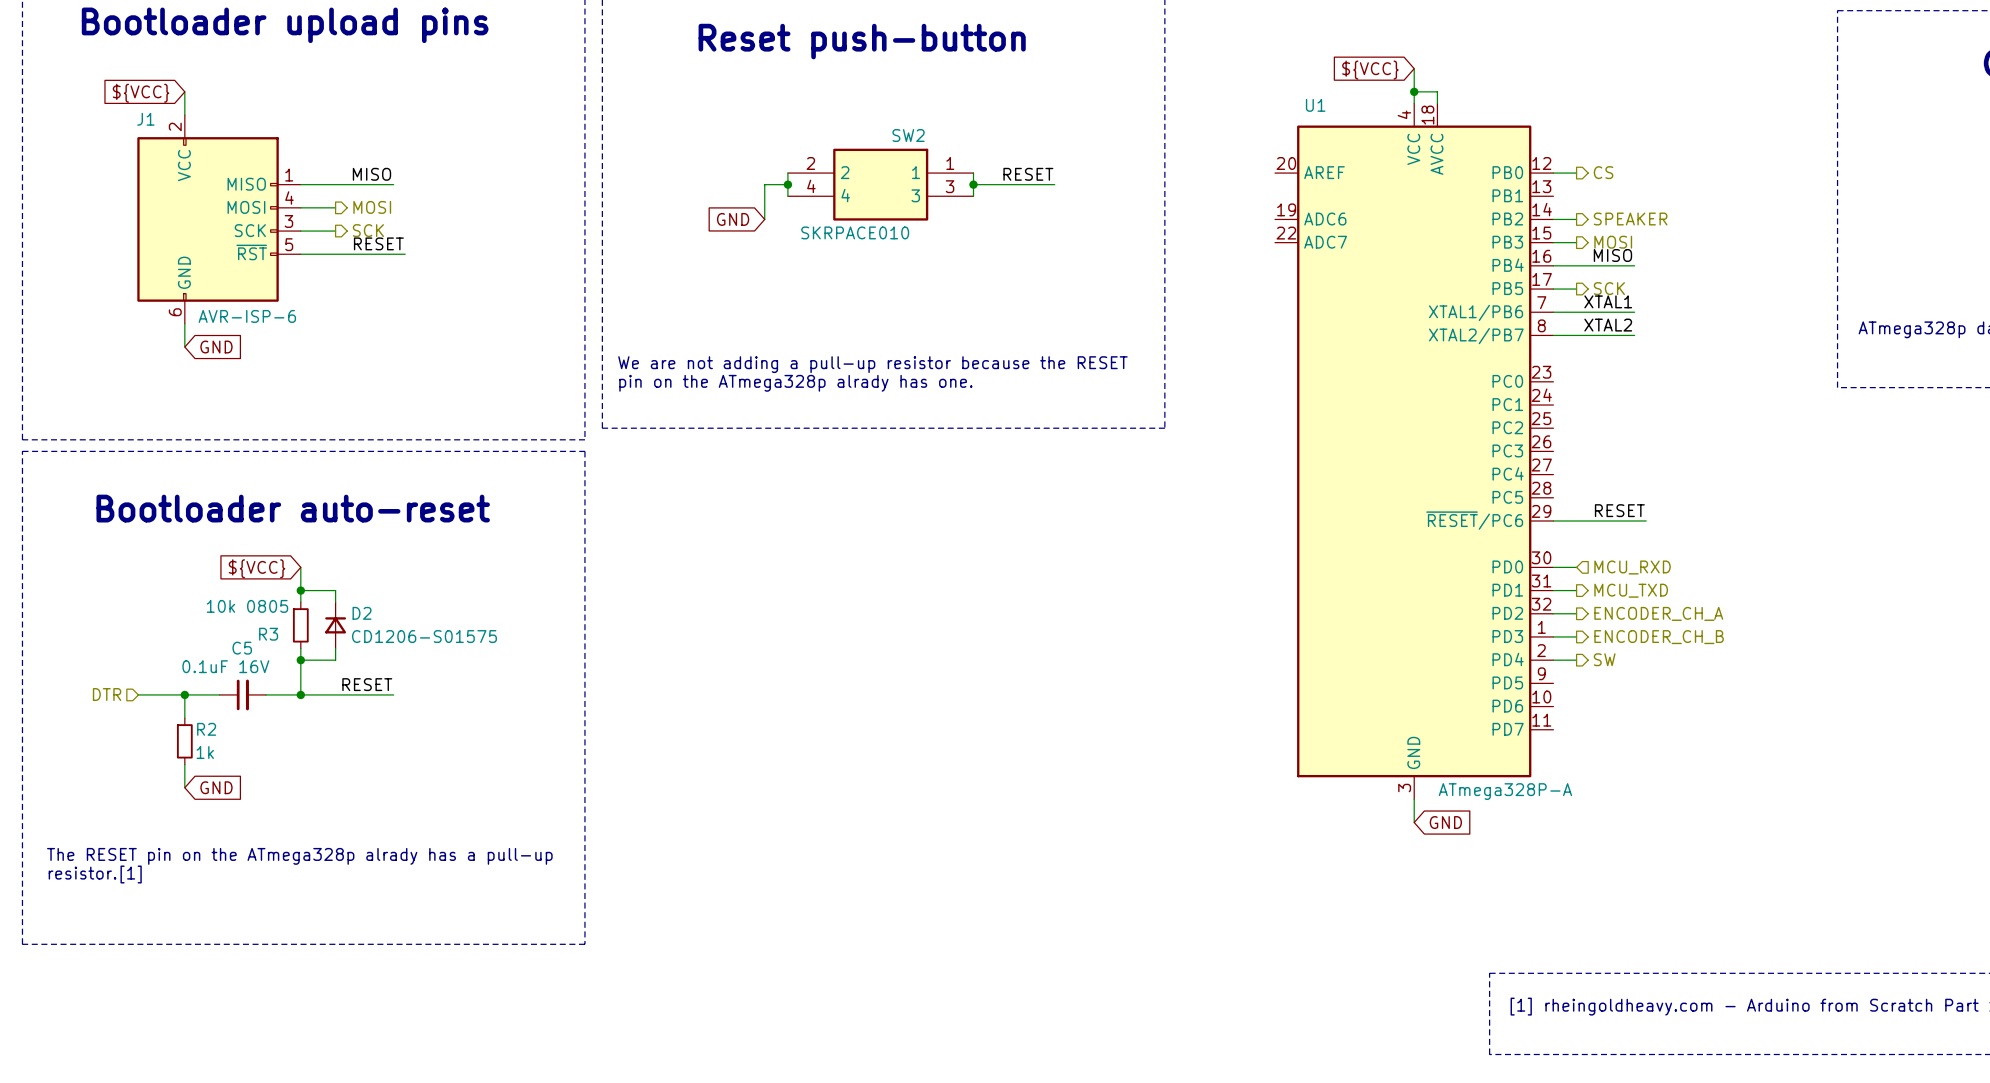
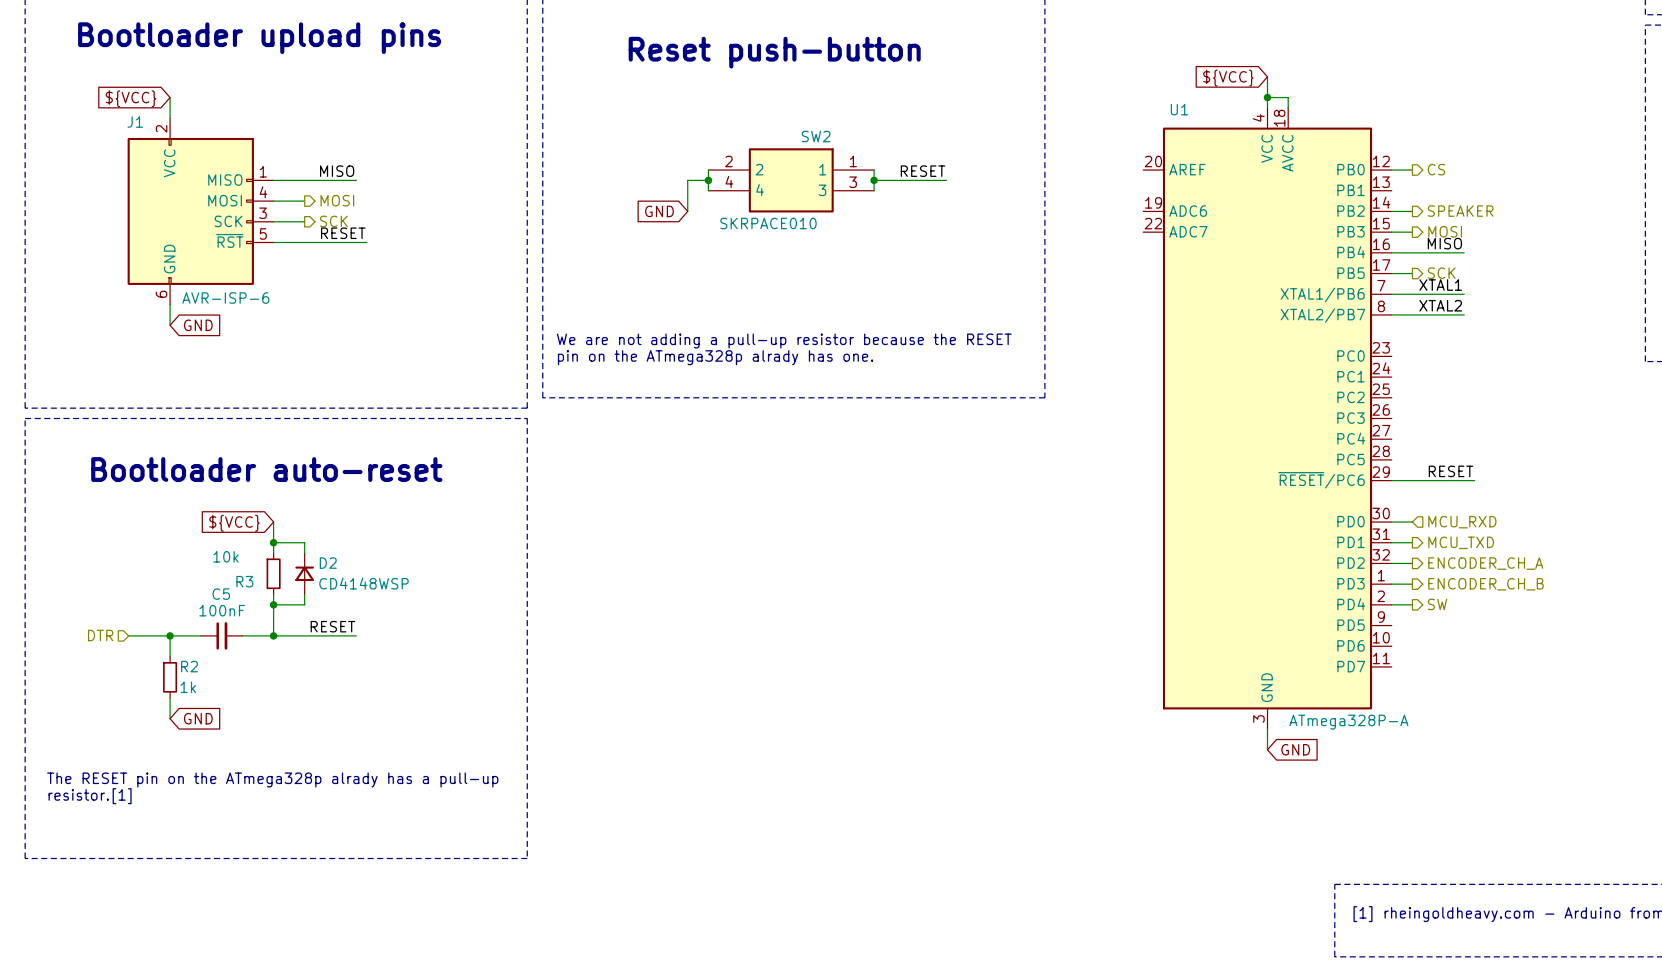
R3 value: 10k 0805 (247, 606) -> 10k (225, 556)
D2 value: CD1206-S01575 (424, 636) -> CD4148WSP (364, 583)
C5 value: 0.1uF 16V (225, 666) -> 100nF (222, 610)

